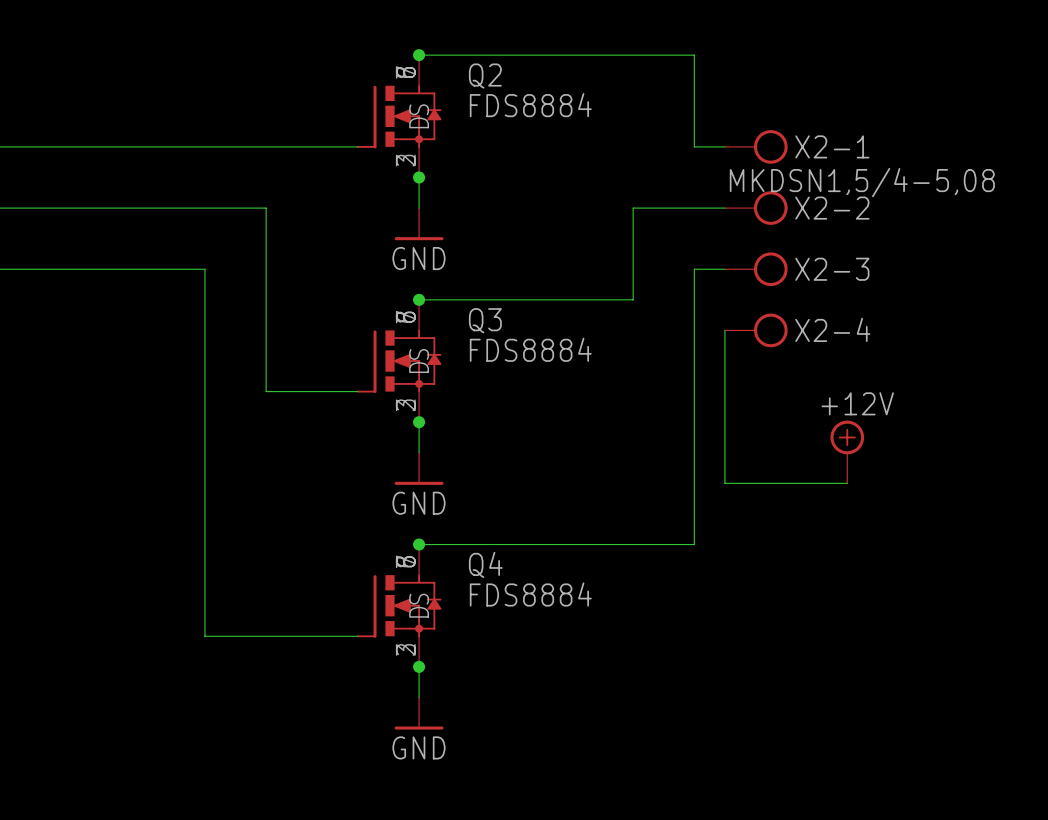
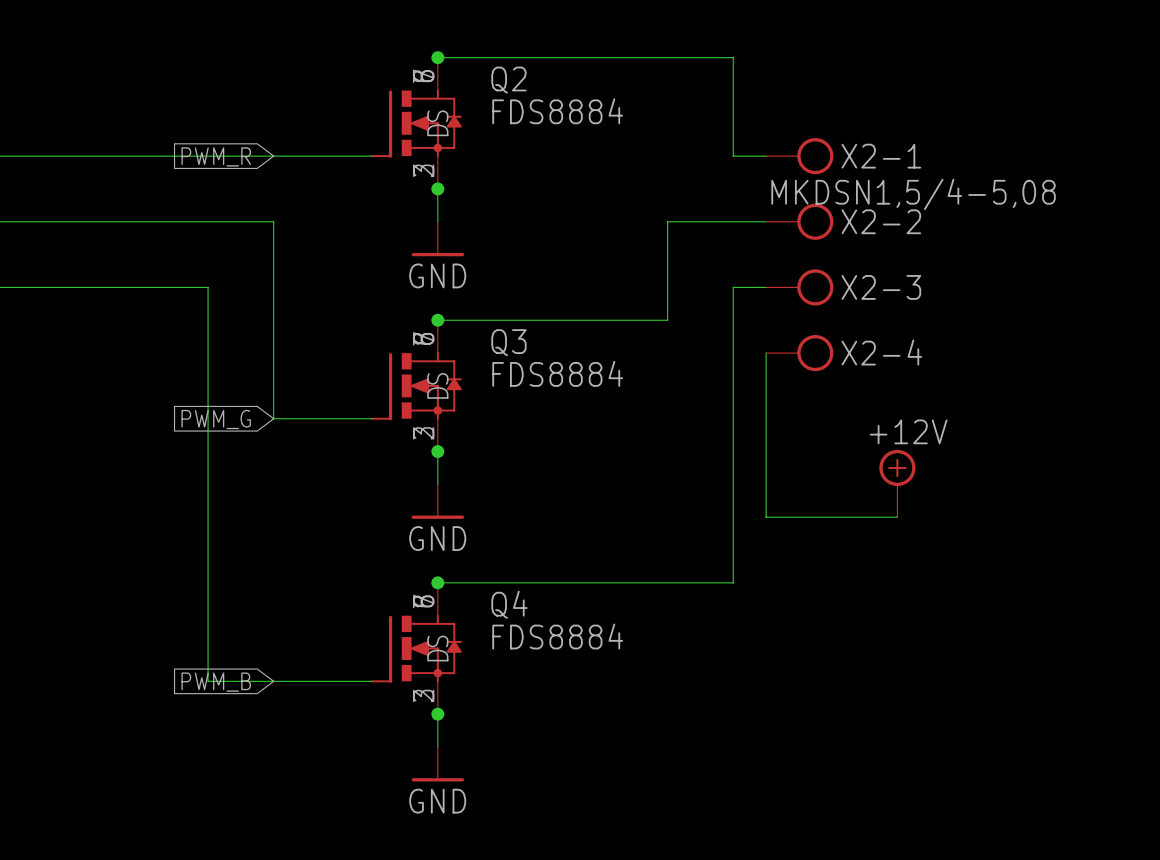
global label: none -> PWM_R (216, 156)
global label: none -> PWM_G (216, 419)
global label: none -> PWM_B (216, 682)

